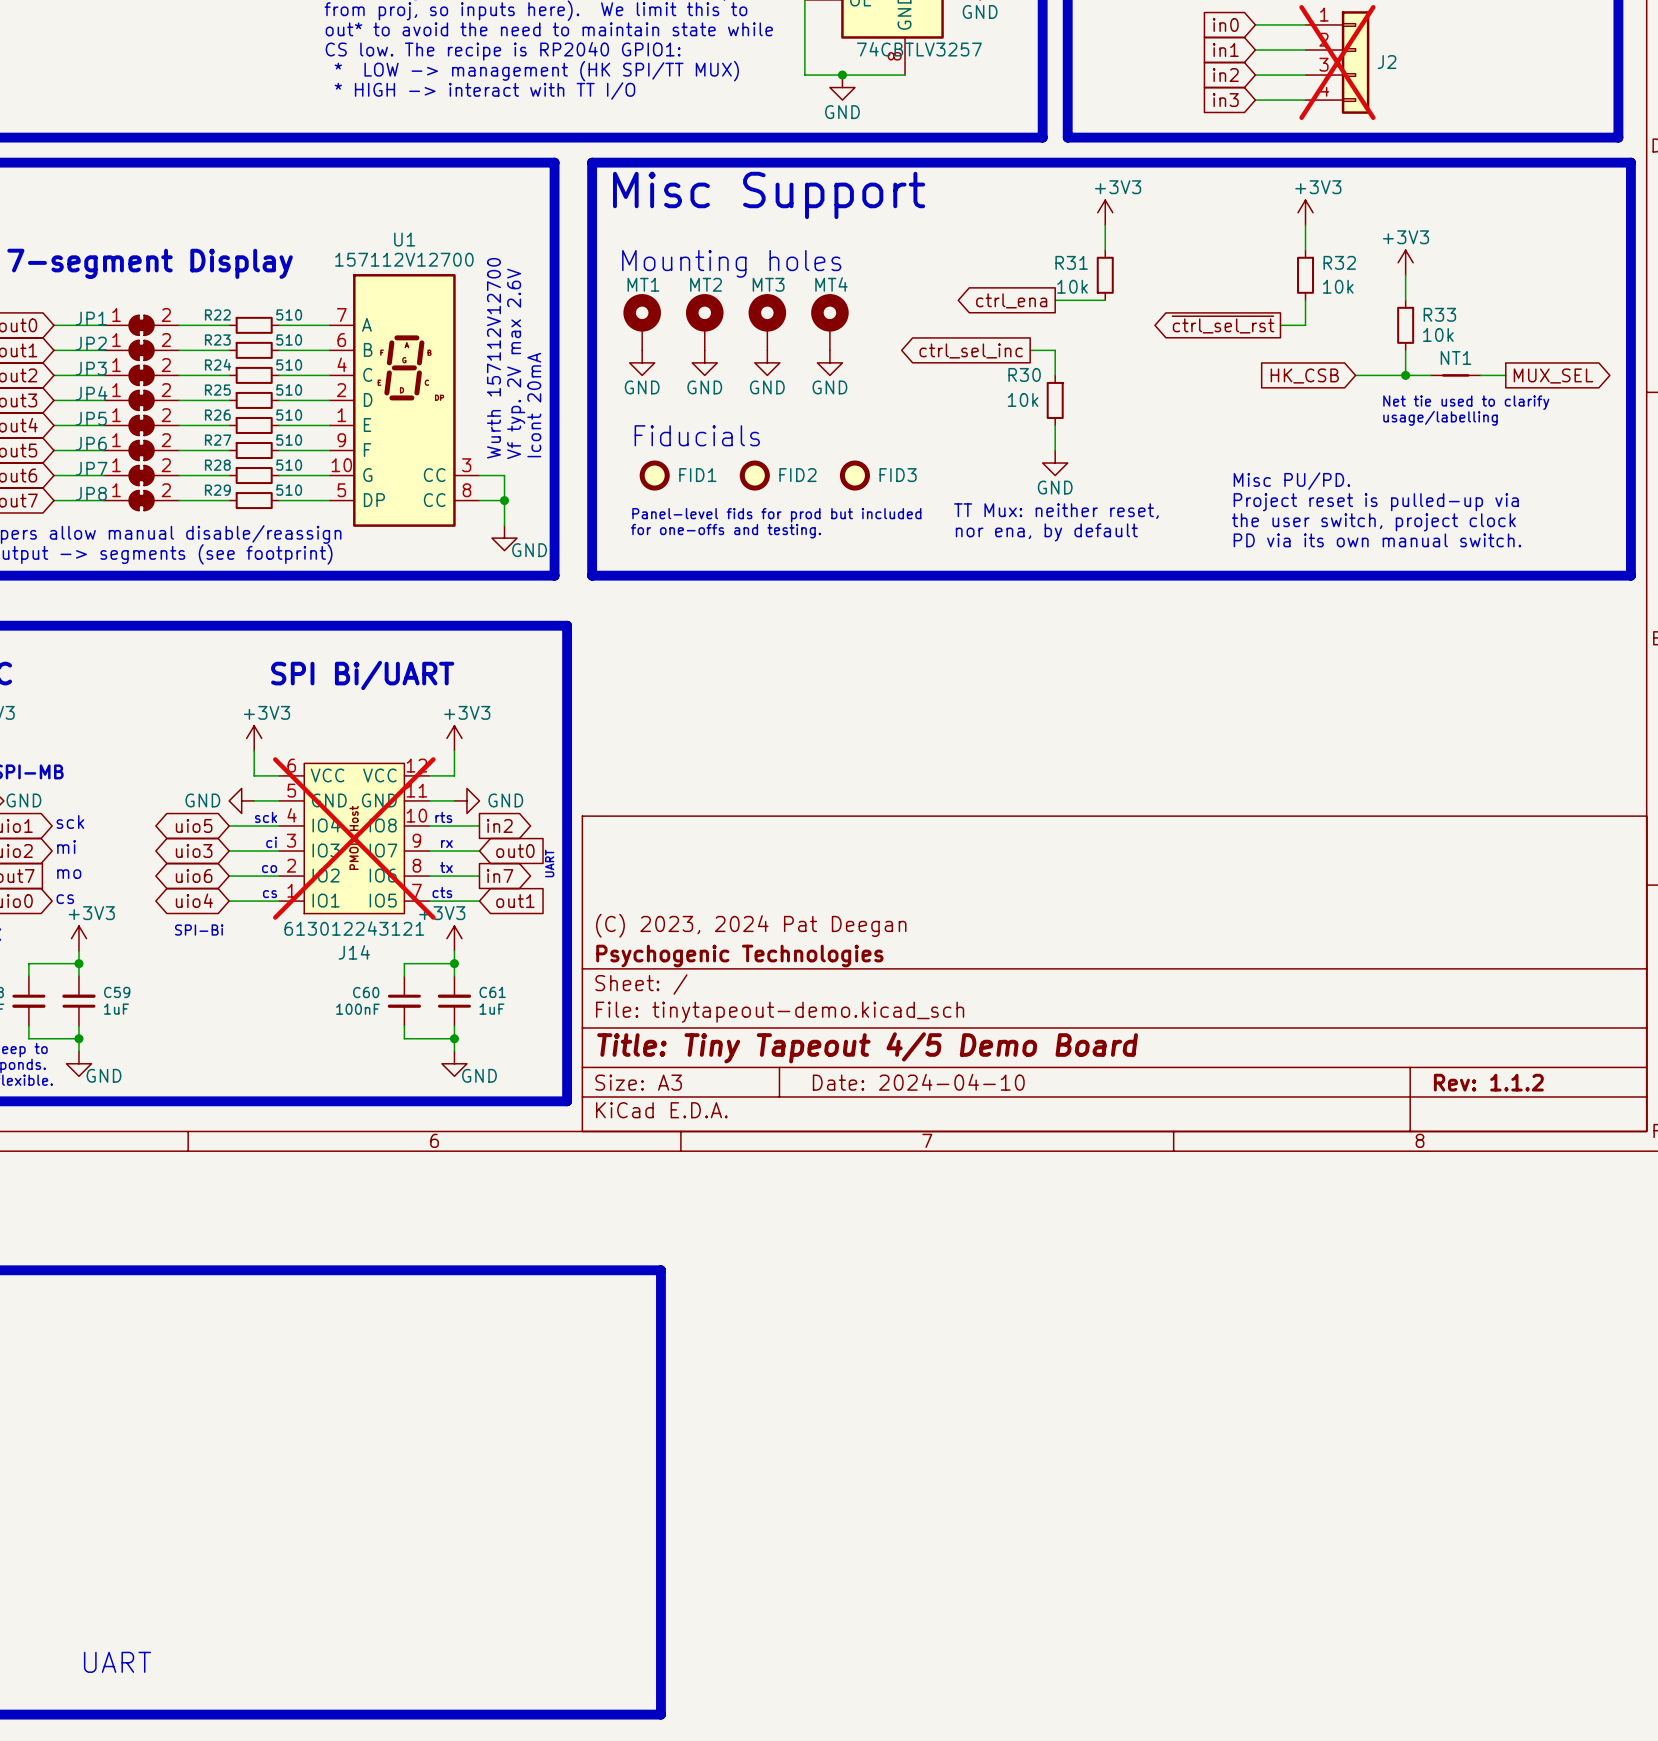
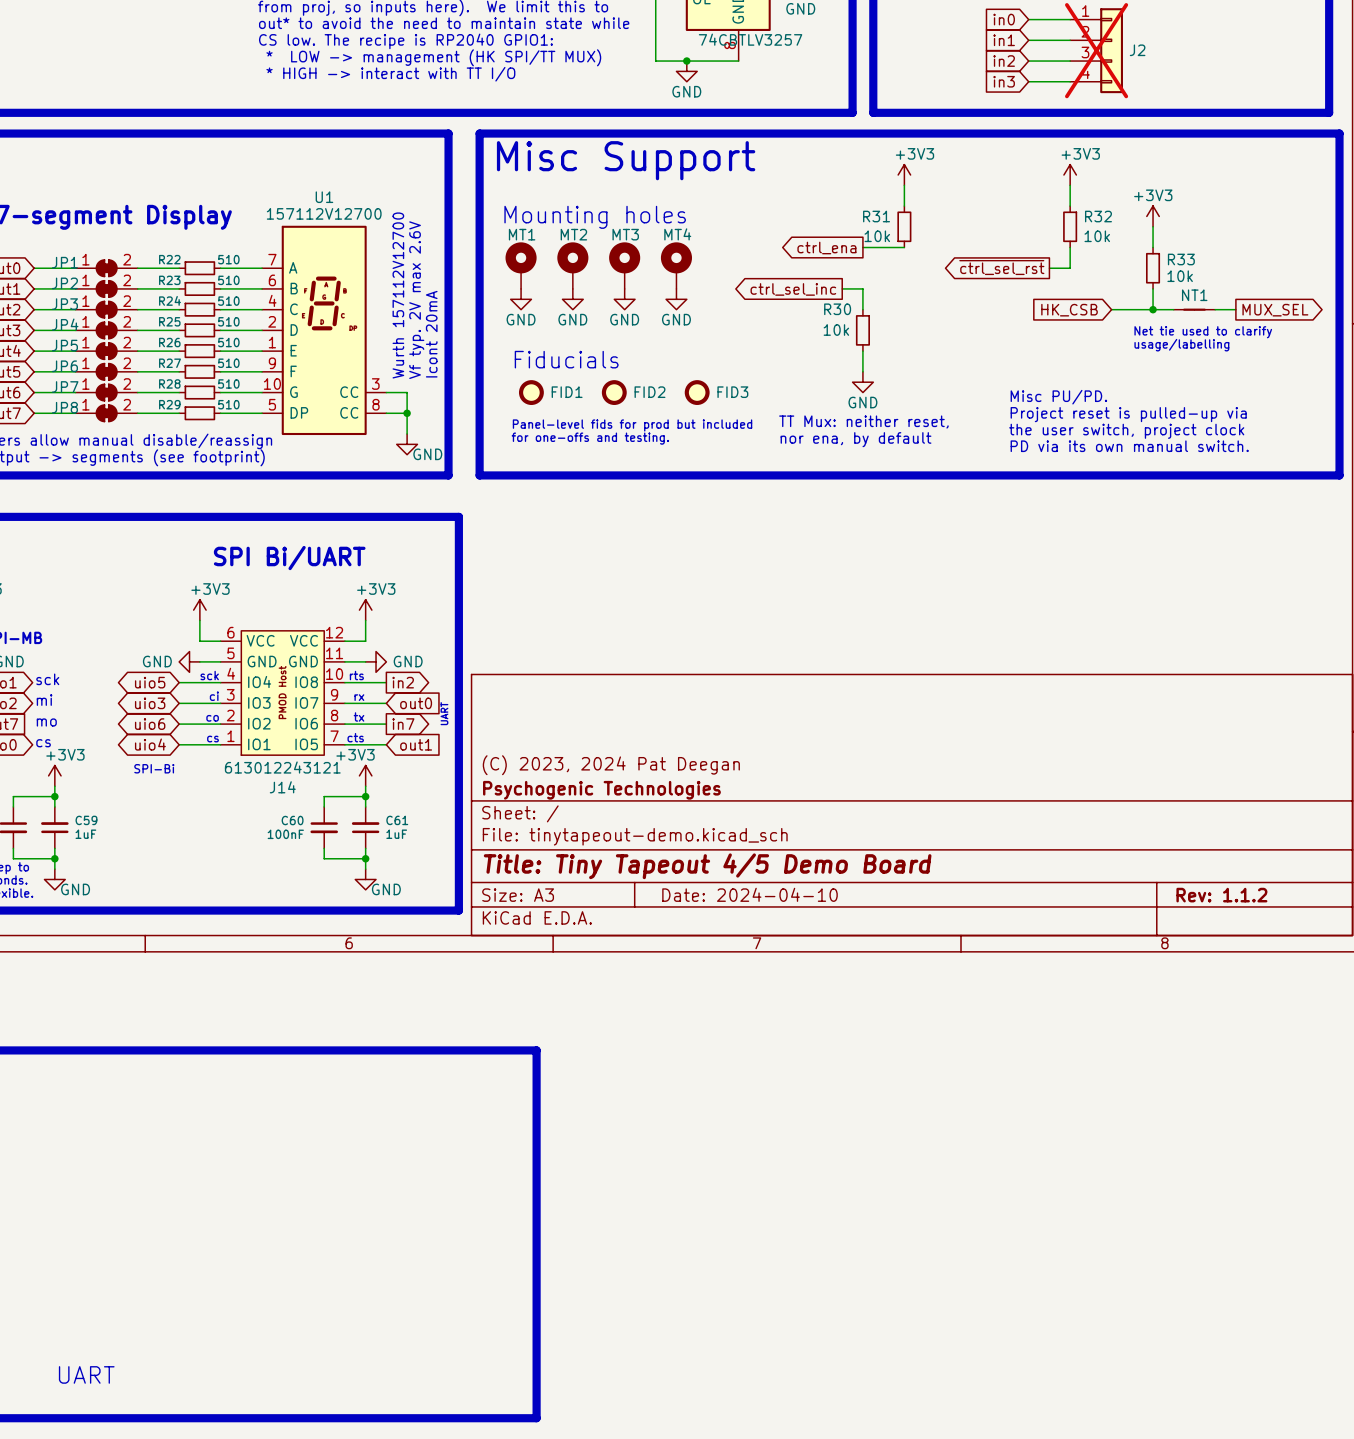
J14 do-not-place cross: (354, 838) -> none

